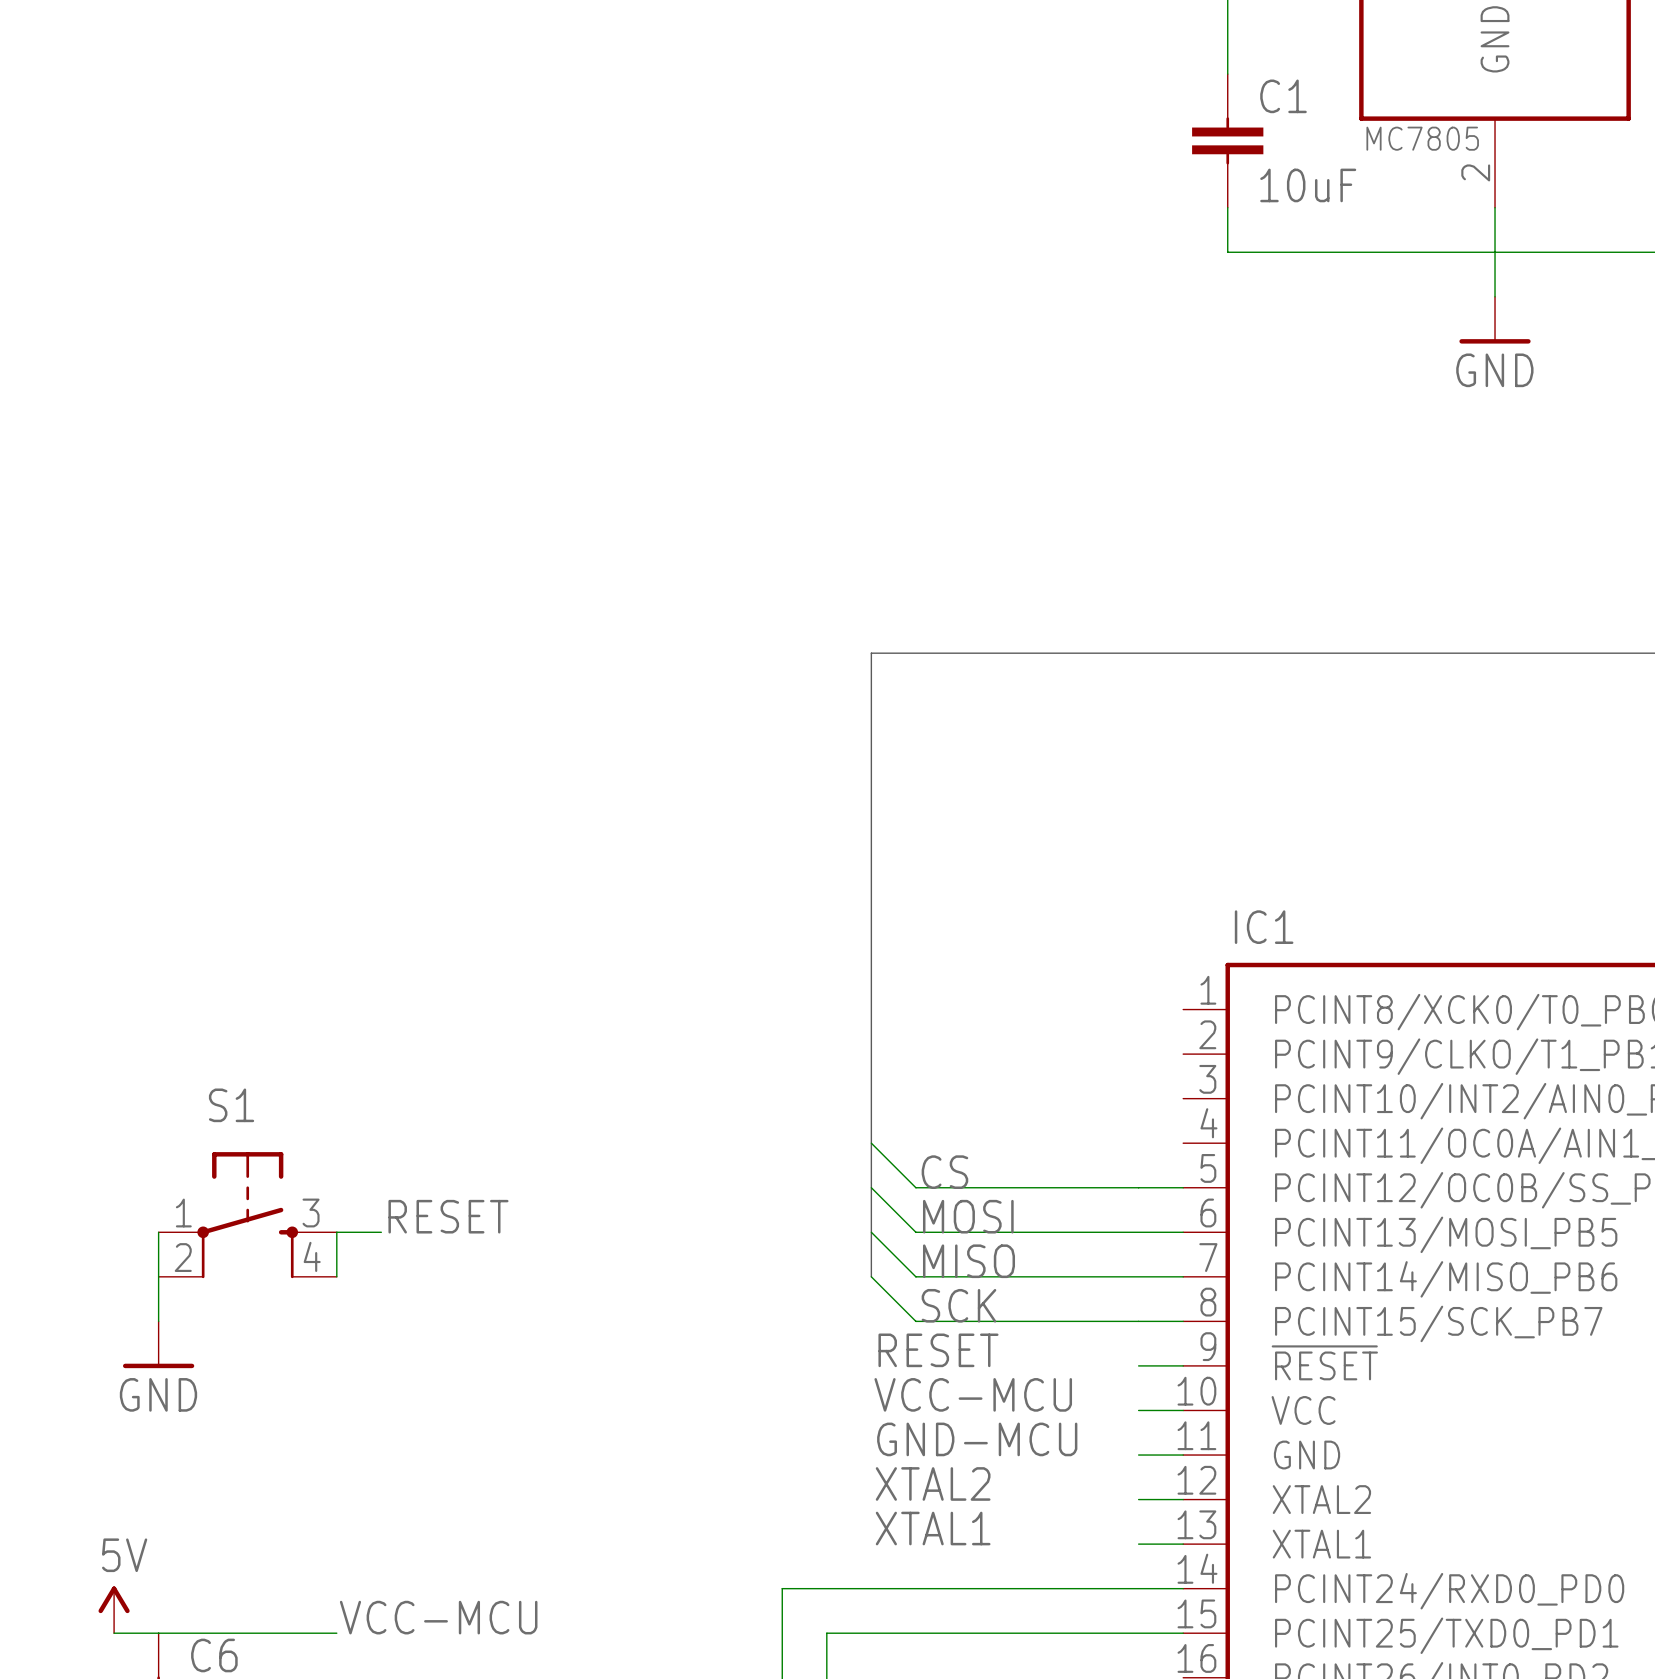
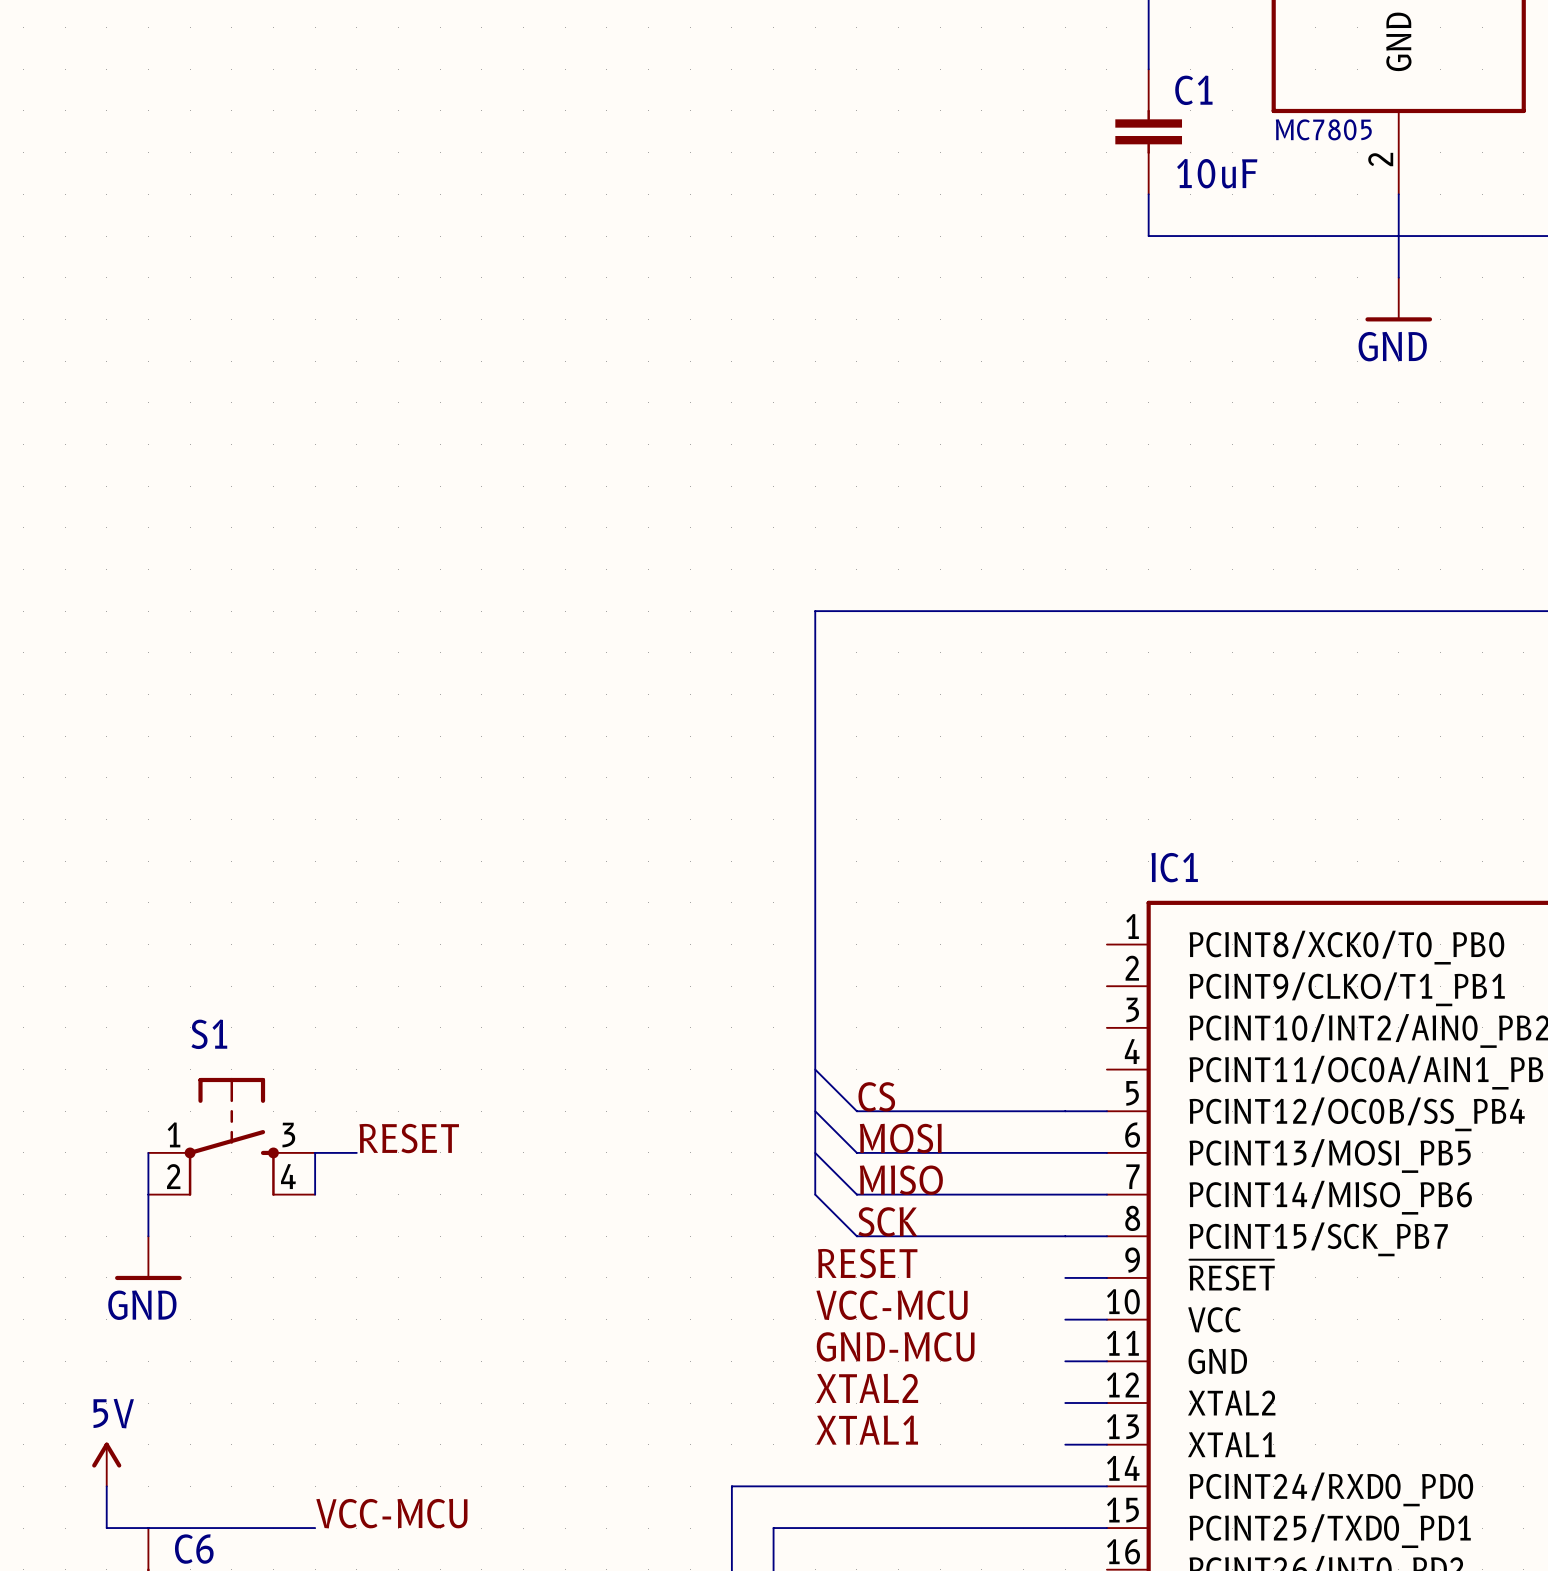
power symbol position: 5V (114, 1609) -> 5V (106, 1464)

